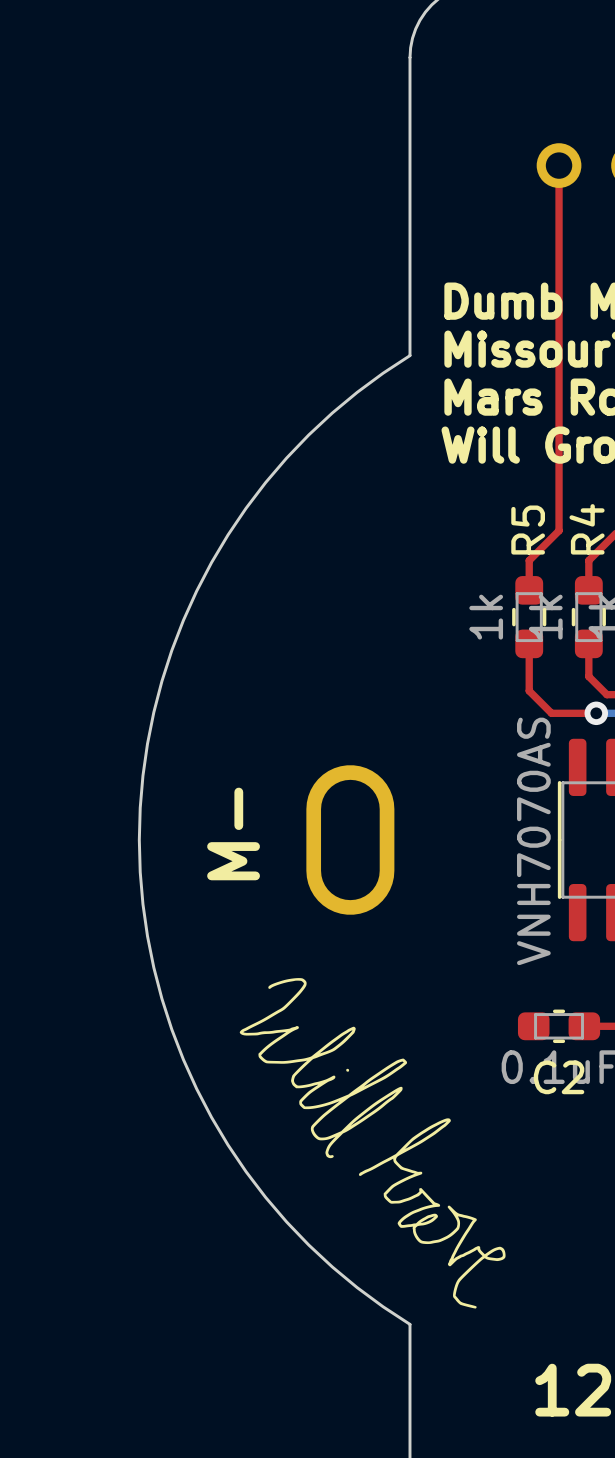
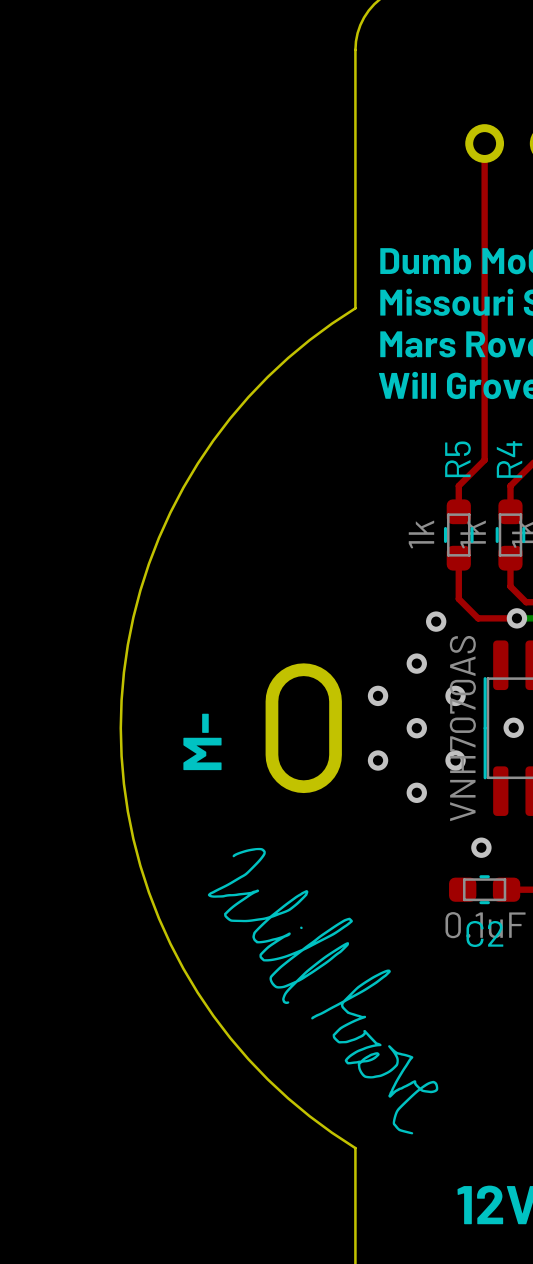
via: none -> (436, 621)
via: none -> (416, 663)
via: none -> (378, 695)
via: none -> (455, 695)
via: none -> (416, 728)
via: none -> (513, 727)
via: none -> (378, 760)
via: none -> (455, 760)
via: none -> (416, 792)
via: none -> (481, 847)

